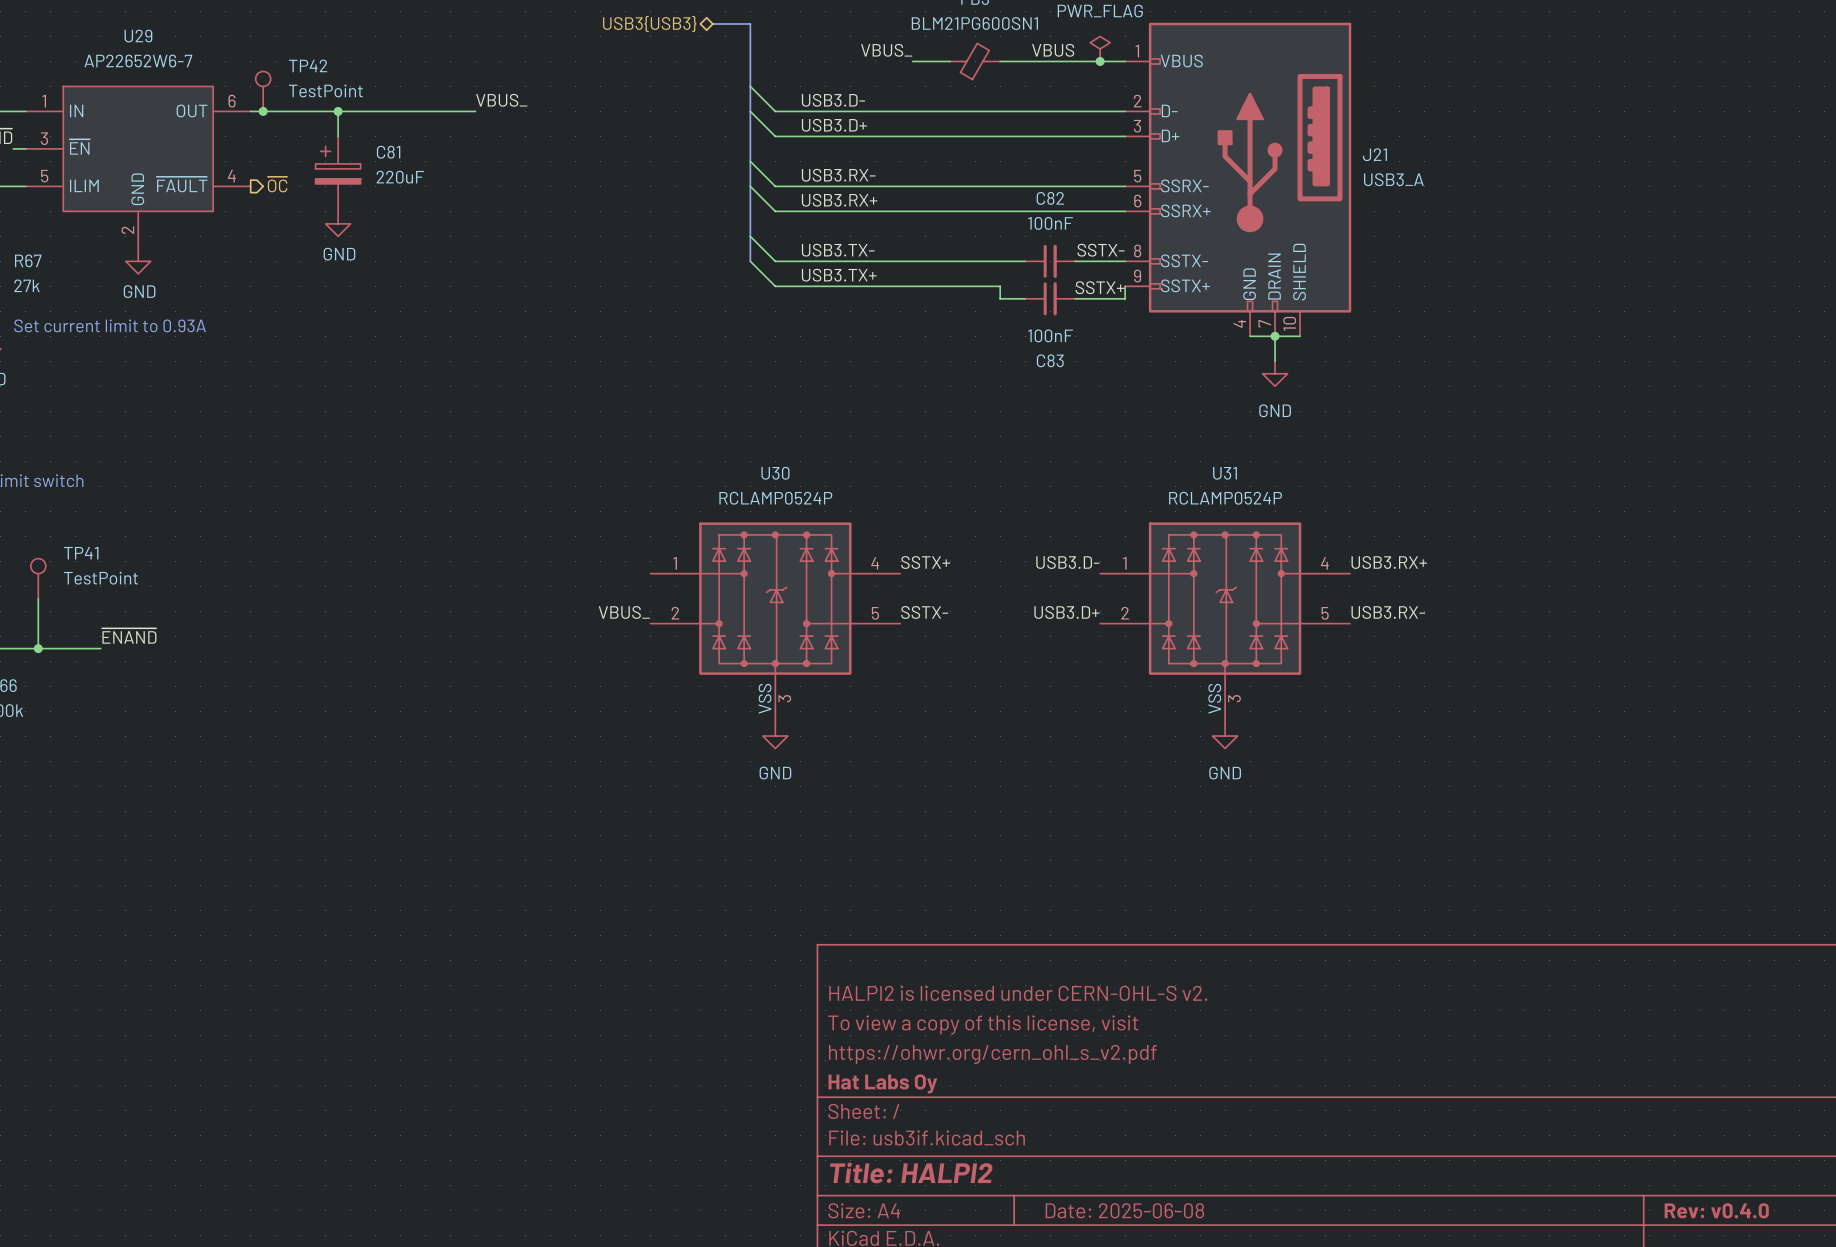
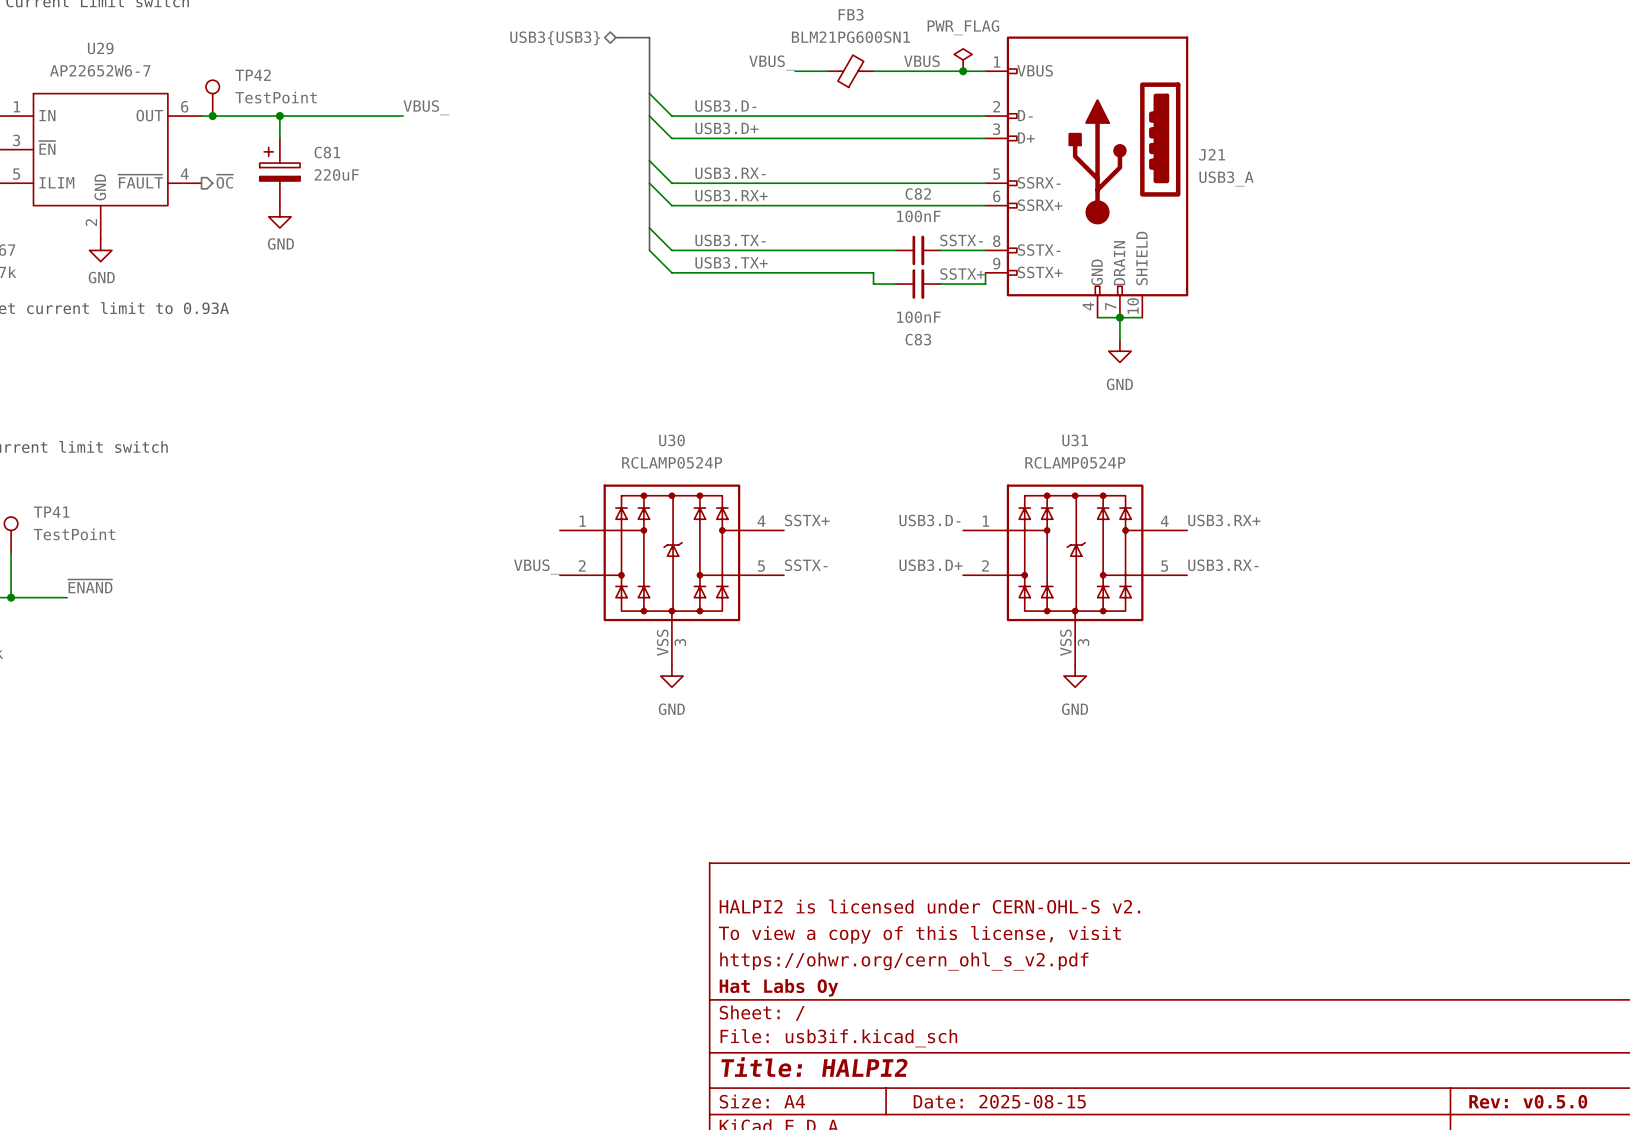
title block: Date: 2025-06-08 (1124, 1210) -> Date: 2025-08-15 (999, 1101)
title block: Rev: v0.4.0 (1716, 1210) -> Rev: v0.5.0 (1528, 1101)

